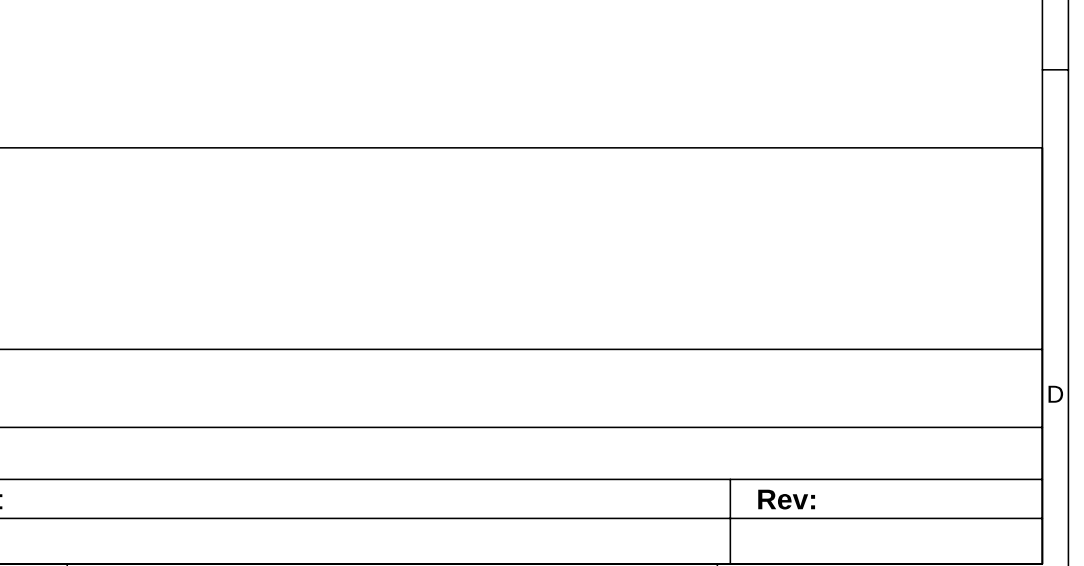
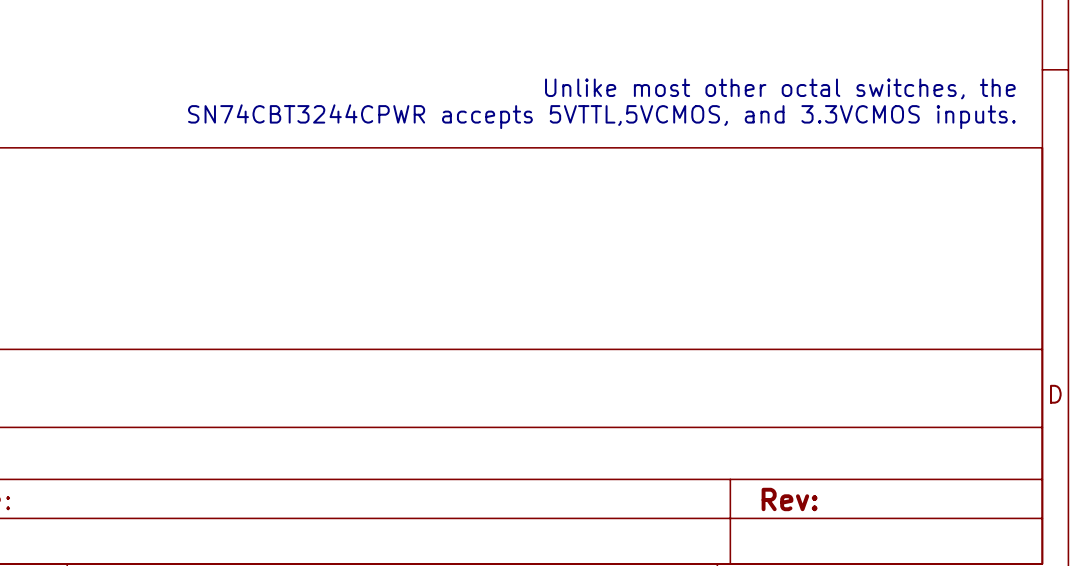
text: none -> Unlike most other octal switches, the (780, 88)
text: none -> SN74CBT3244CPWR accepts 5VTTL,5VCMOS, and 3.3VCMOS inputs. (601, 116)

